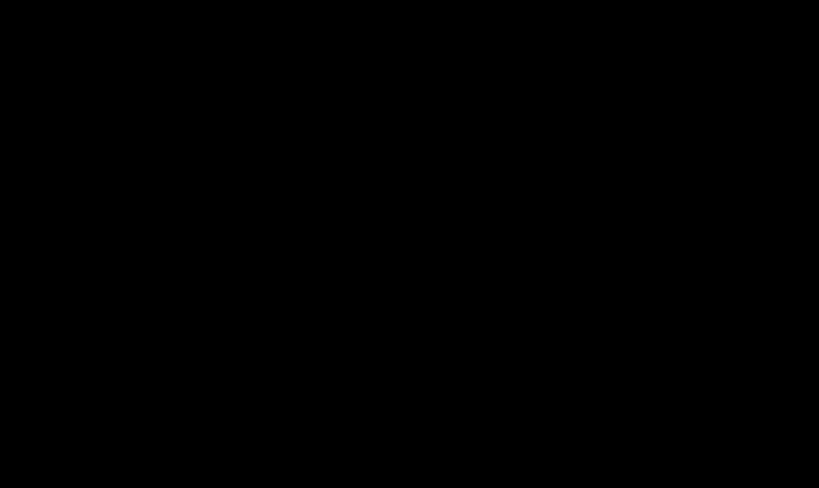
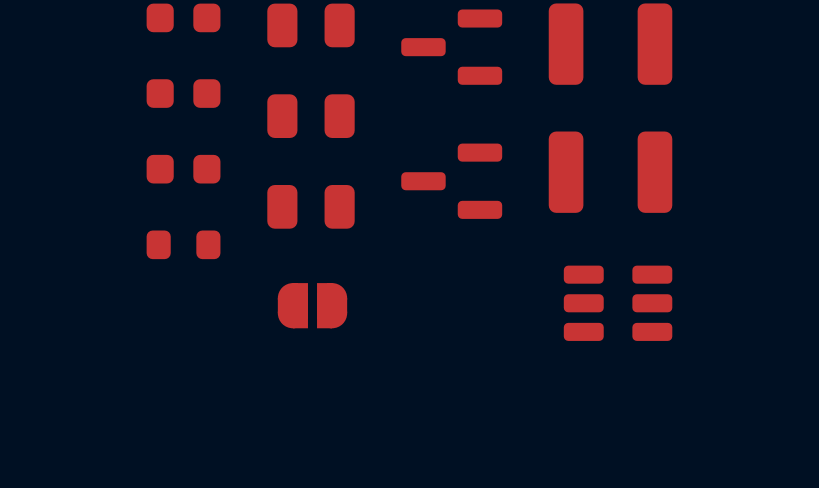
part: none -> (183, 17)
part: none -> (310, 25)
part: none -> (610, 44)
part: none -> (451, 47)
part: none -> (183, 93)
part: none -> (310, 116)
part: none -> (183, 169)
part: none -> (610, 172)
part: none -> (451, 181)
part: none -> (310, 206)
part: none -> (183, 244)
part: none -> (618, 303)
part: none -> (312, 305)

